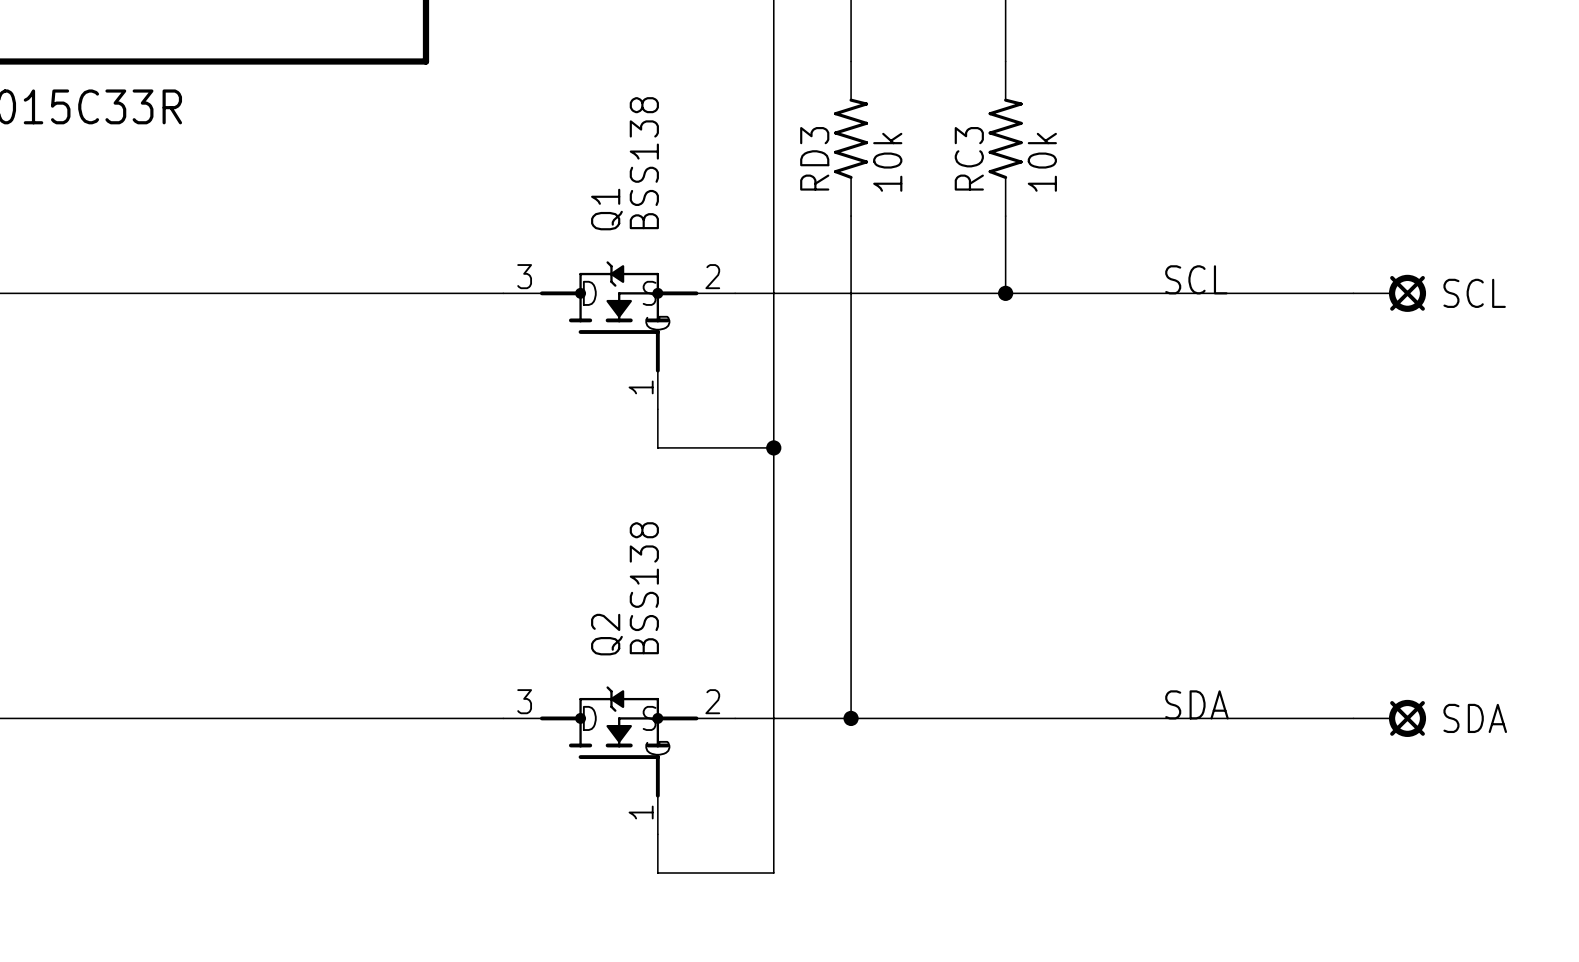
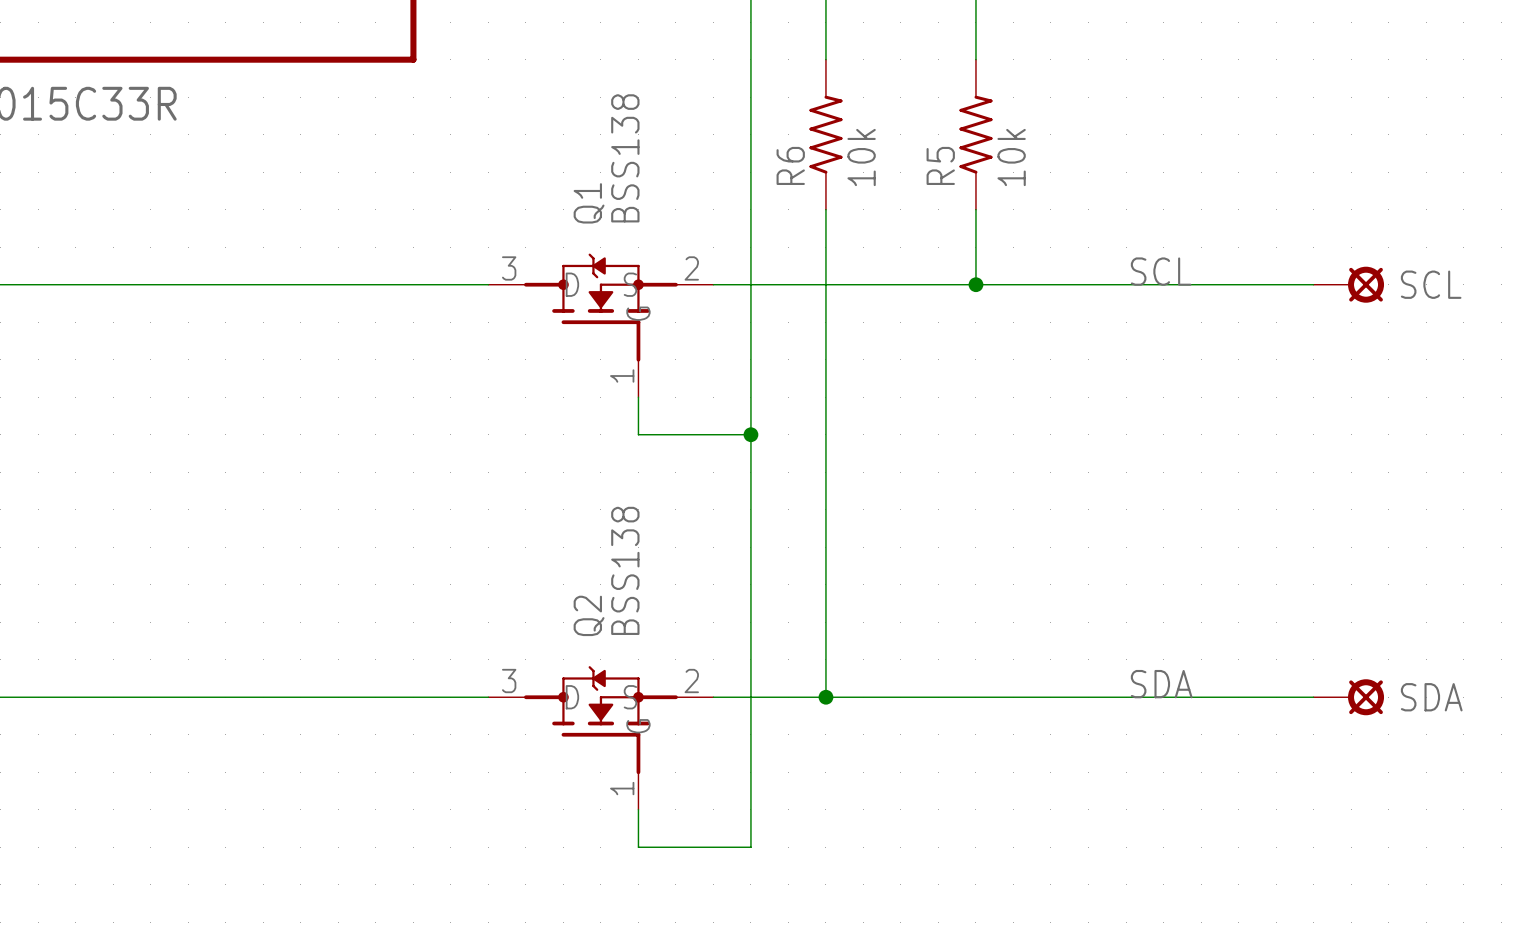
RD3 name: RD3 (814, 158) -> R6 (790, 165)
RC3 name: RC3 (969, 158) -> R5 (940, 165)

